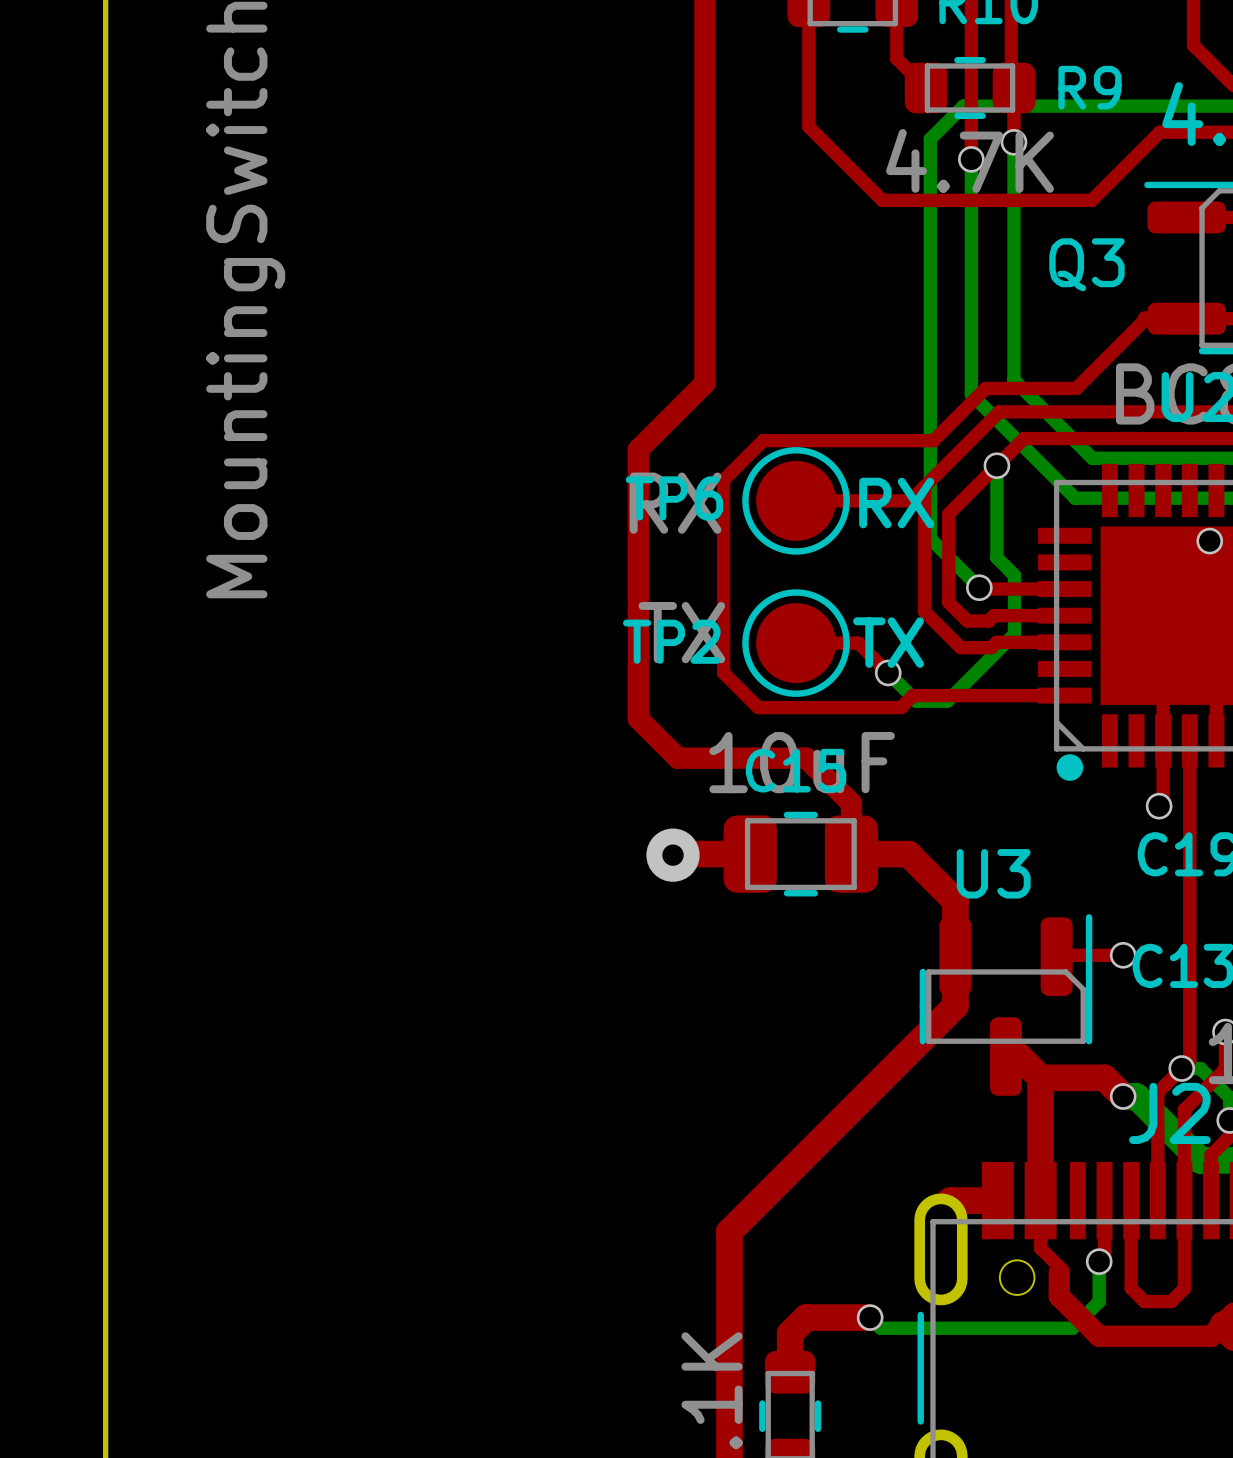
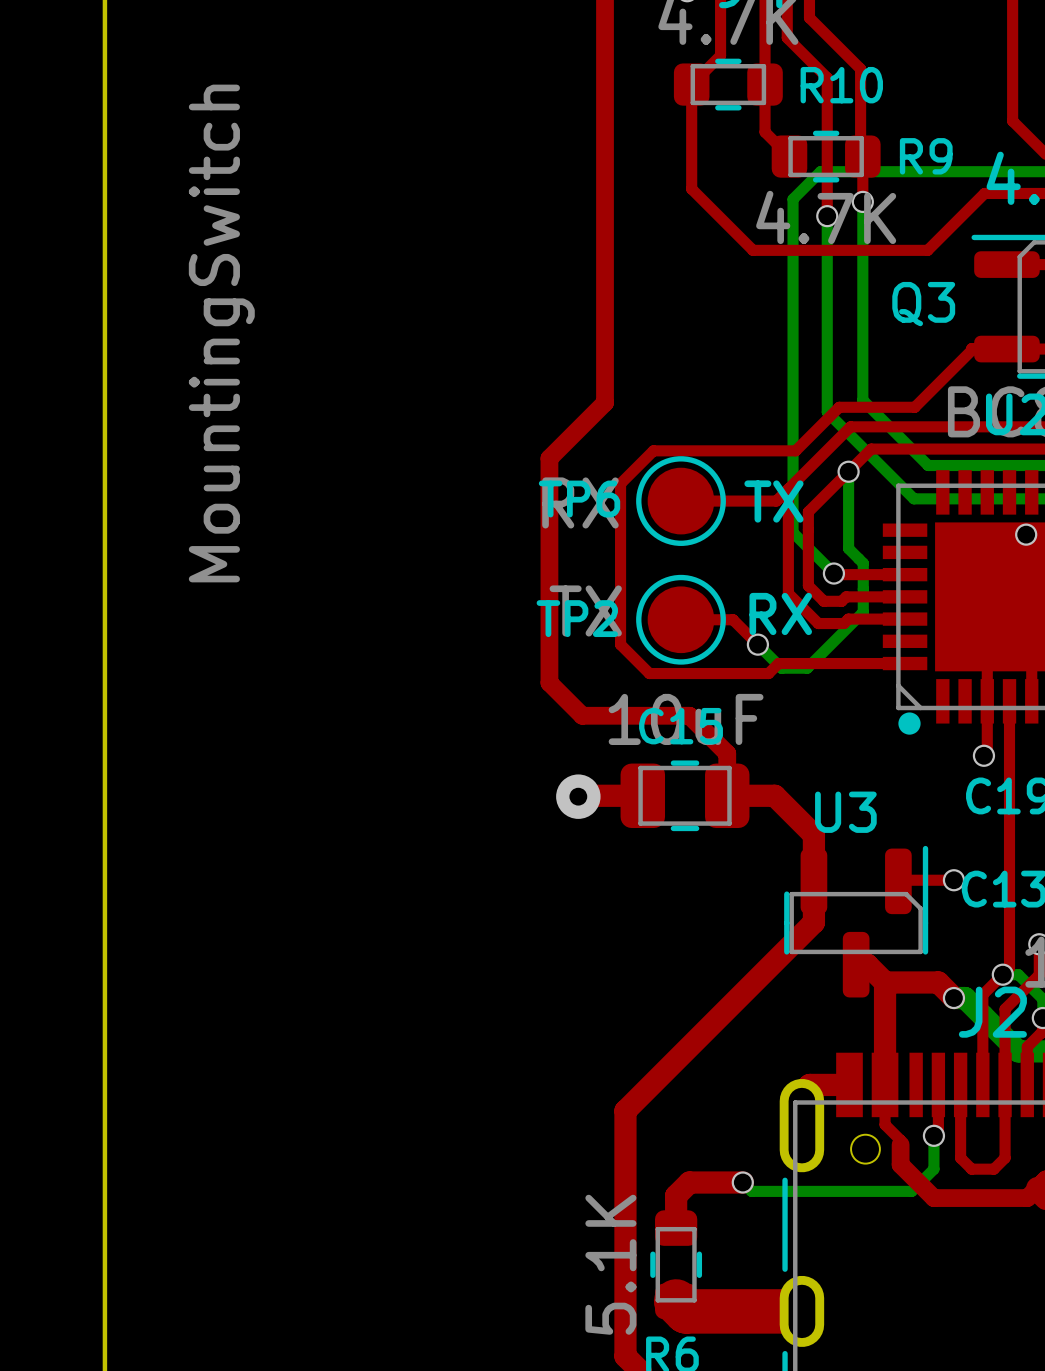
text: RX (896, 503) -> TX (773, 501)
text: TX (888, 642) -> RX (780, 613)

